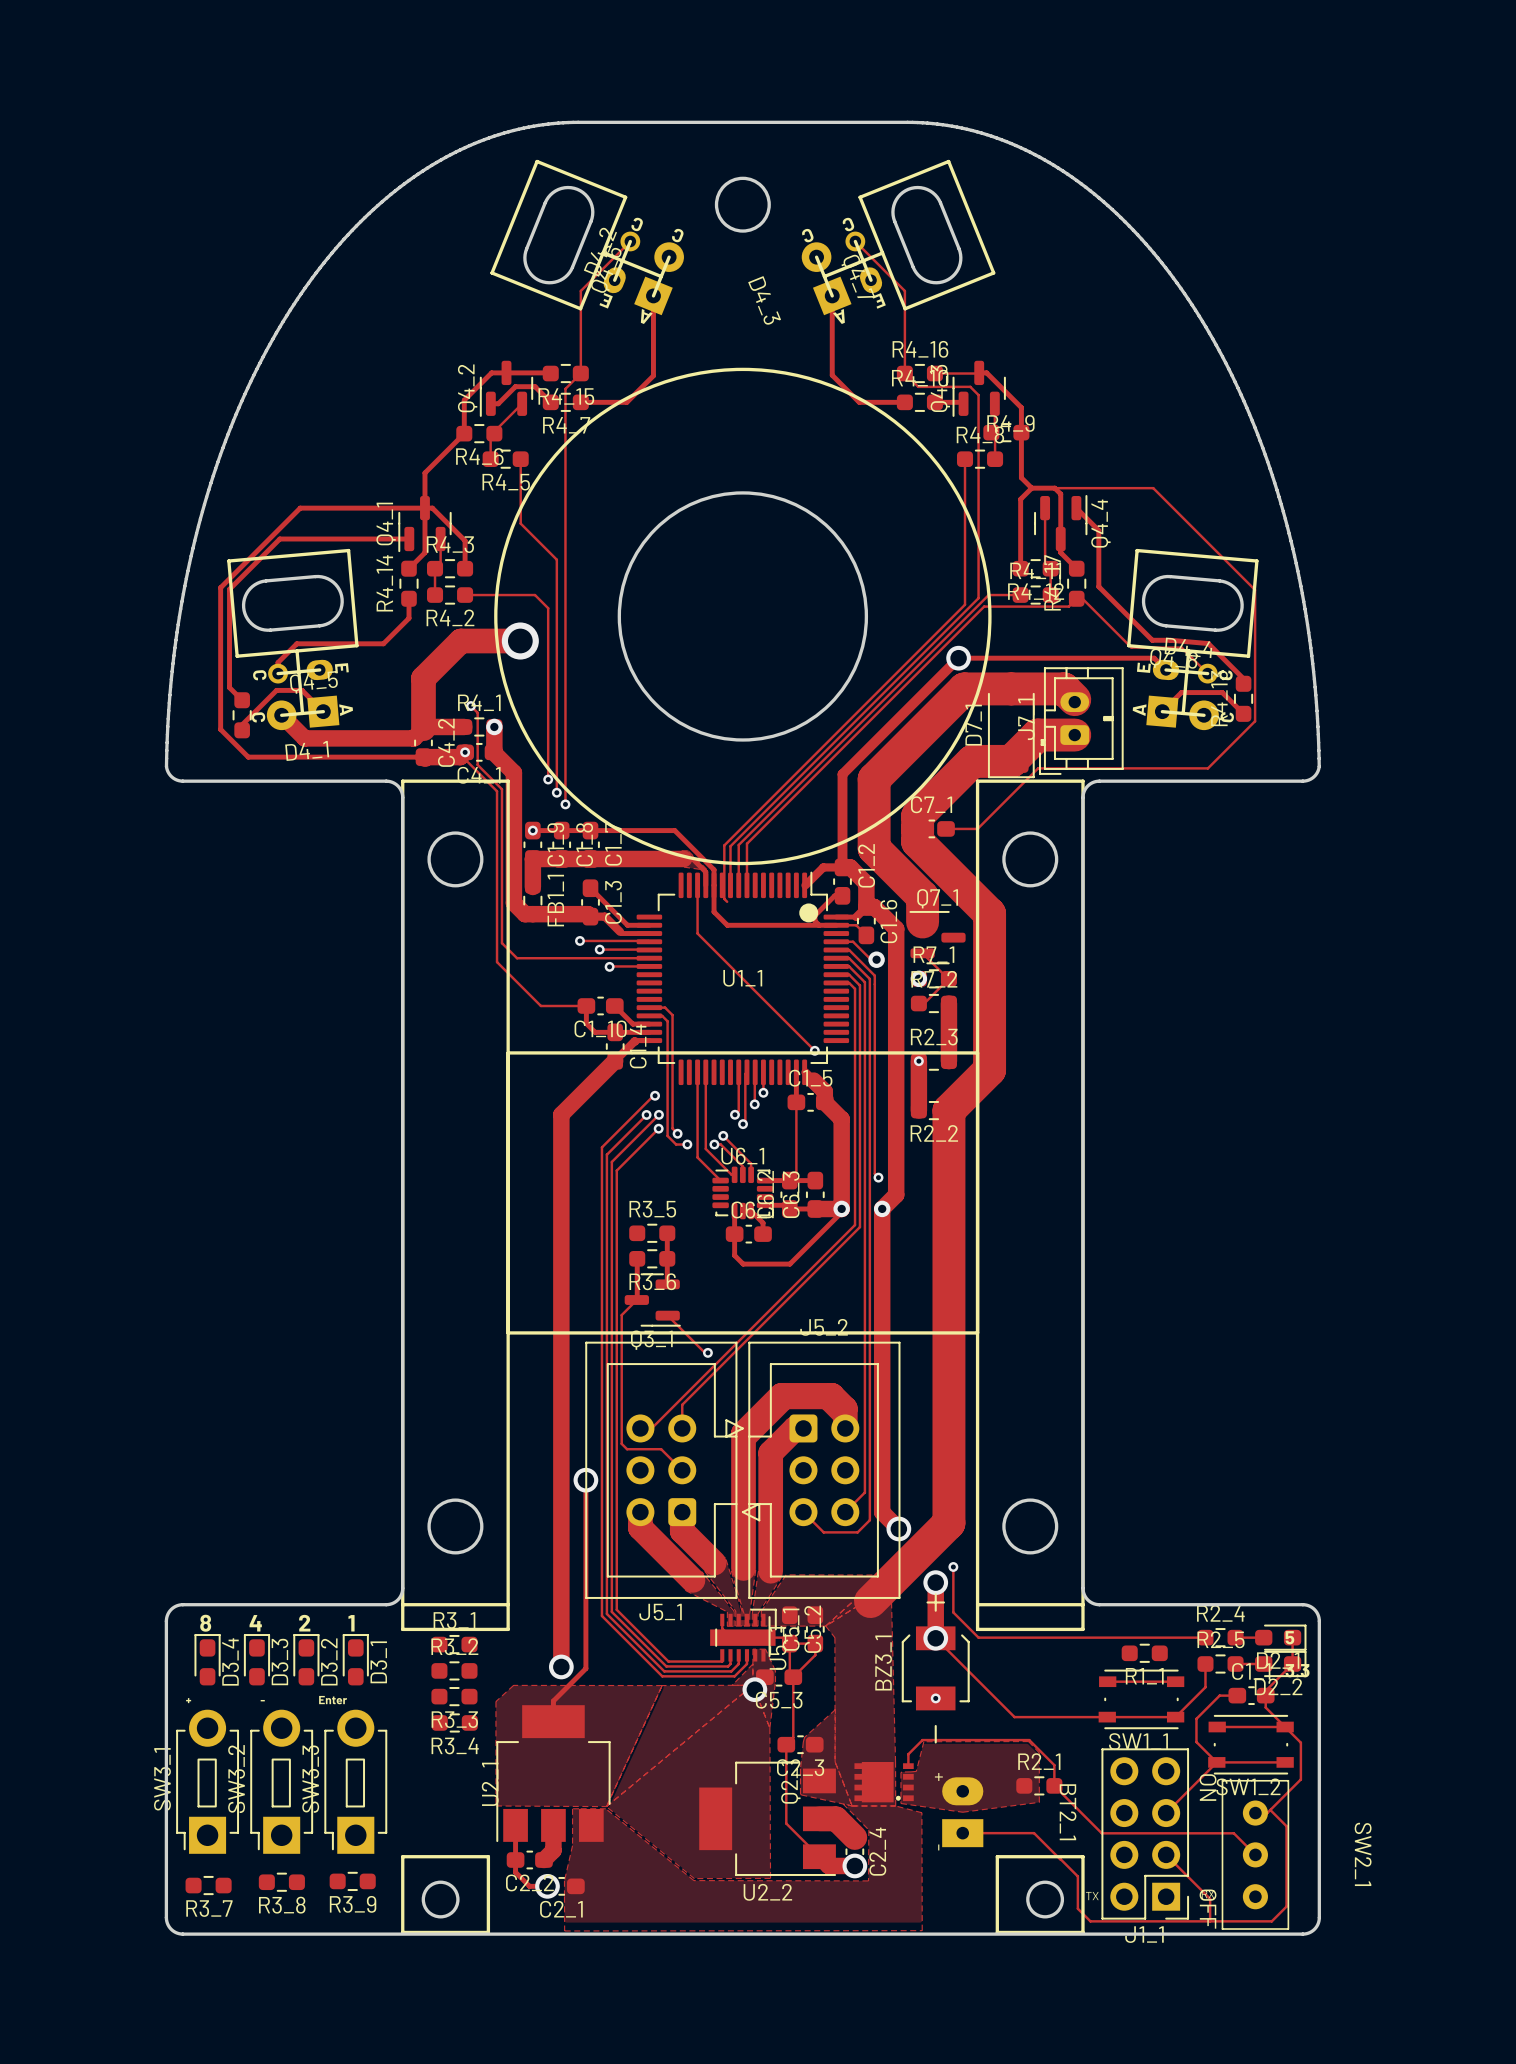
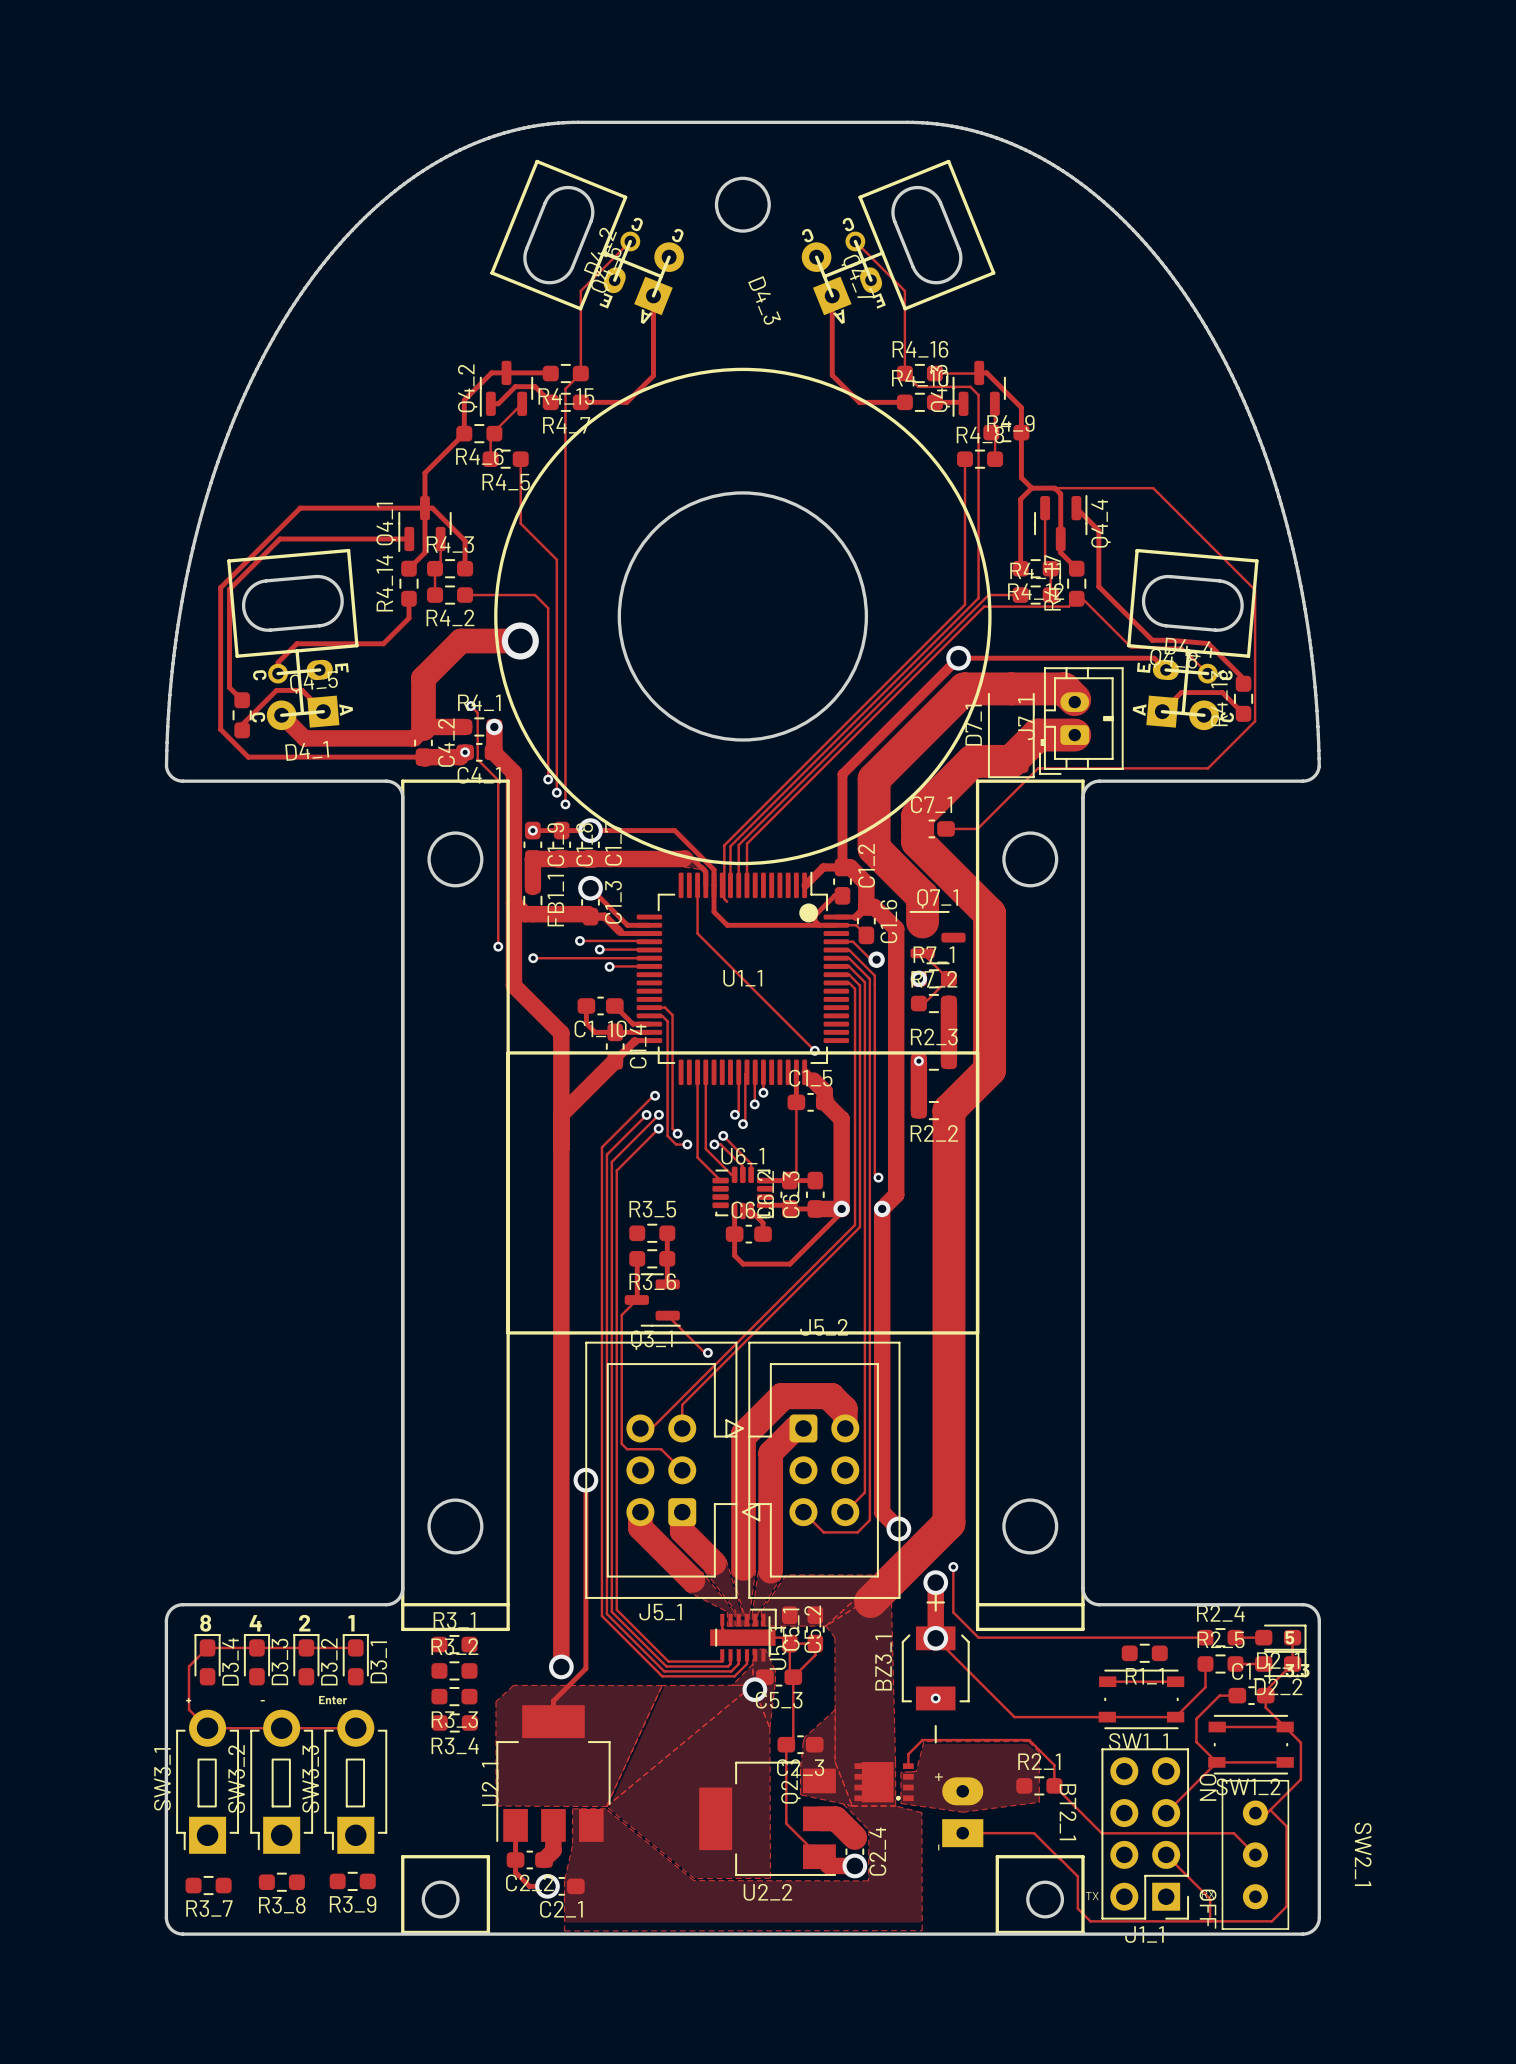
track: (465, 759) (497, 791) (497, 962) (540, 1005) (586, 1005) -> none
track: (477, 759) (477, 764) (501, 789) (501, 943) (517, 958) (533, 958) -> (477, 759) (498, 780) (498, 946)
via: none -> (590, 830)
via: none -> (590, 888)
track: none -> (513, 903) (513, 985) (561, 1033) (561, 1114)
via: none -> (498, 946)
via: none -> (533, 958)
track: none -> (355, 1647) (207, 1647) (189, 1666) (189, 1709) (207, 1728) (355, 1728)

